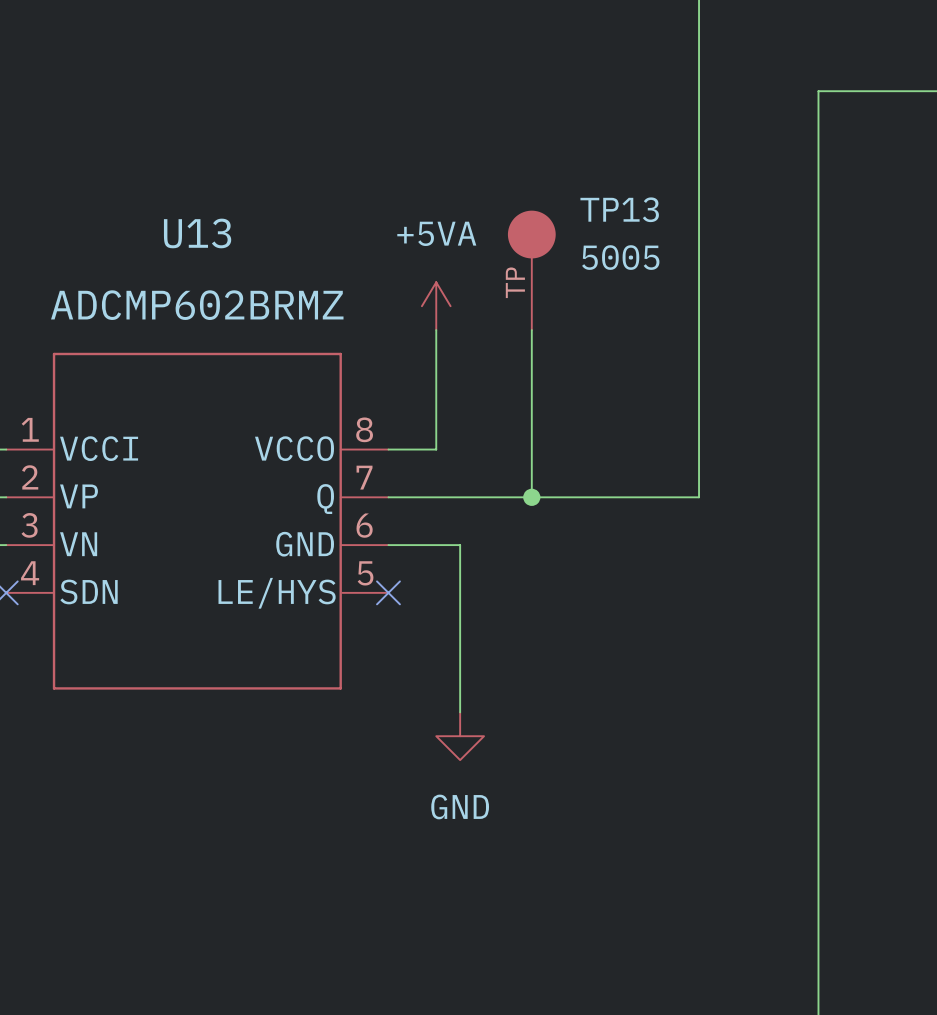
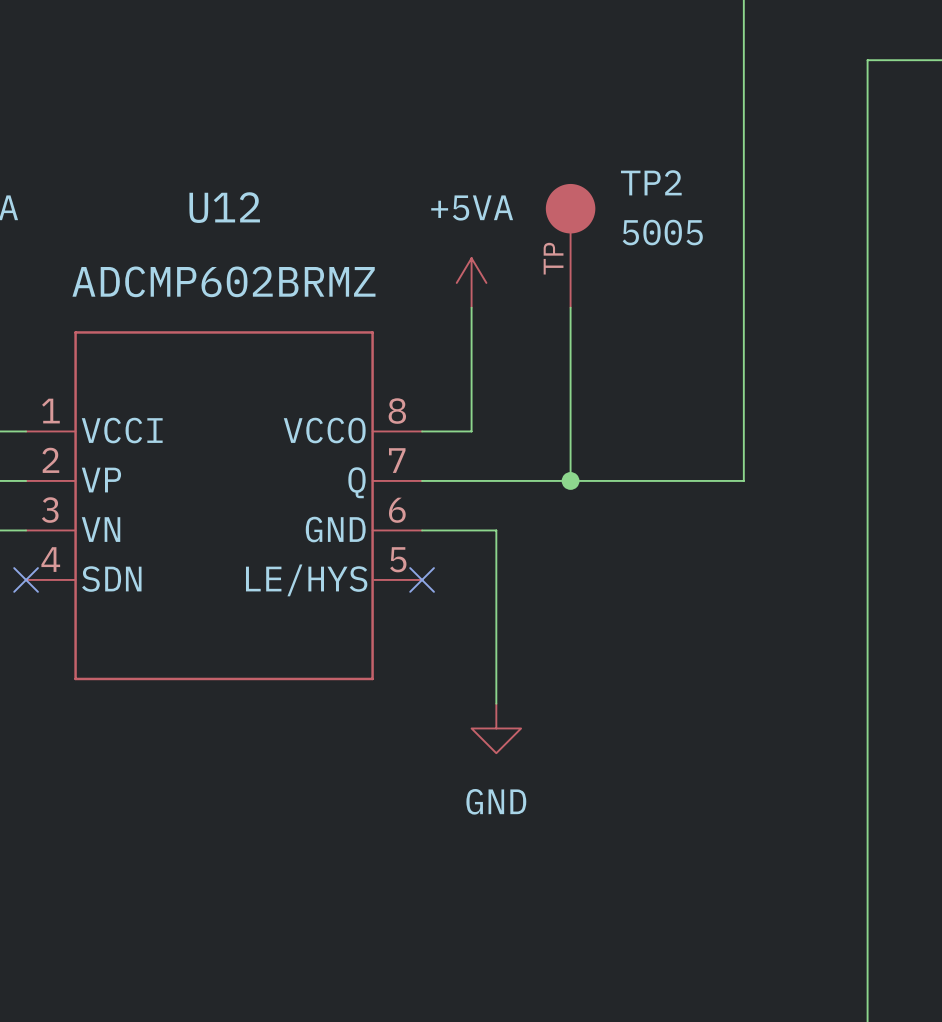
TP13 name: TP13 (619, 209) -> TP2 (651, 182)
U13 name: U13 (197, 233) -> U12 (224, 207)

